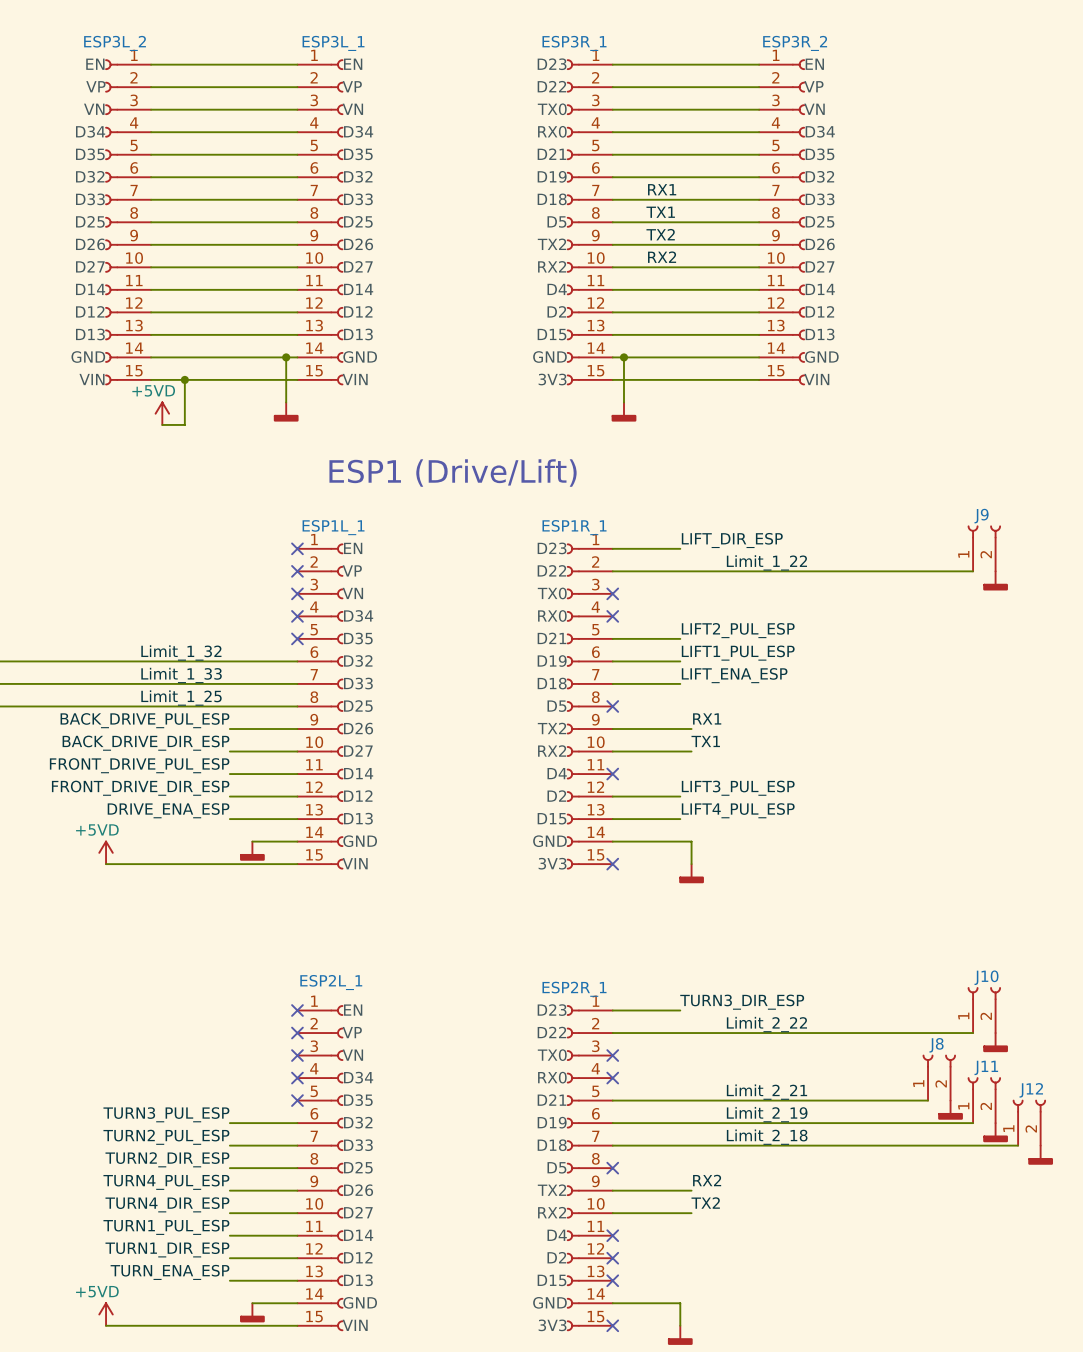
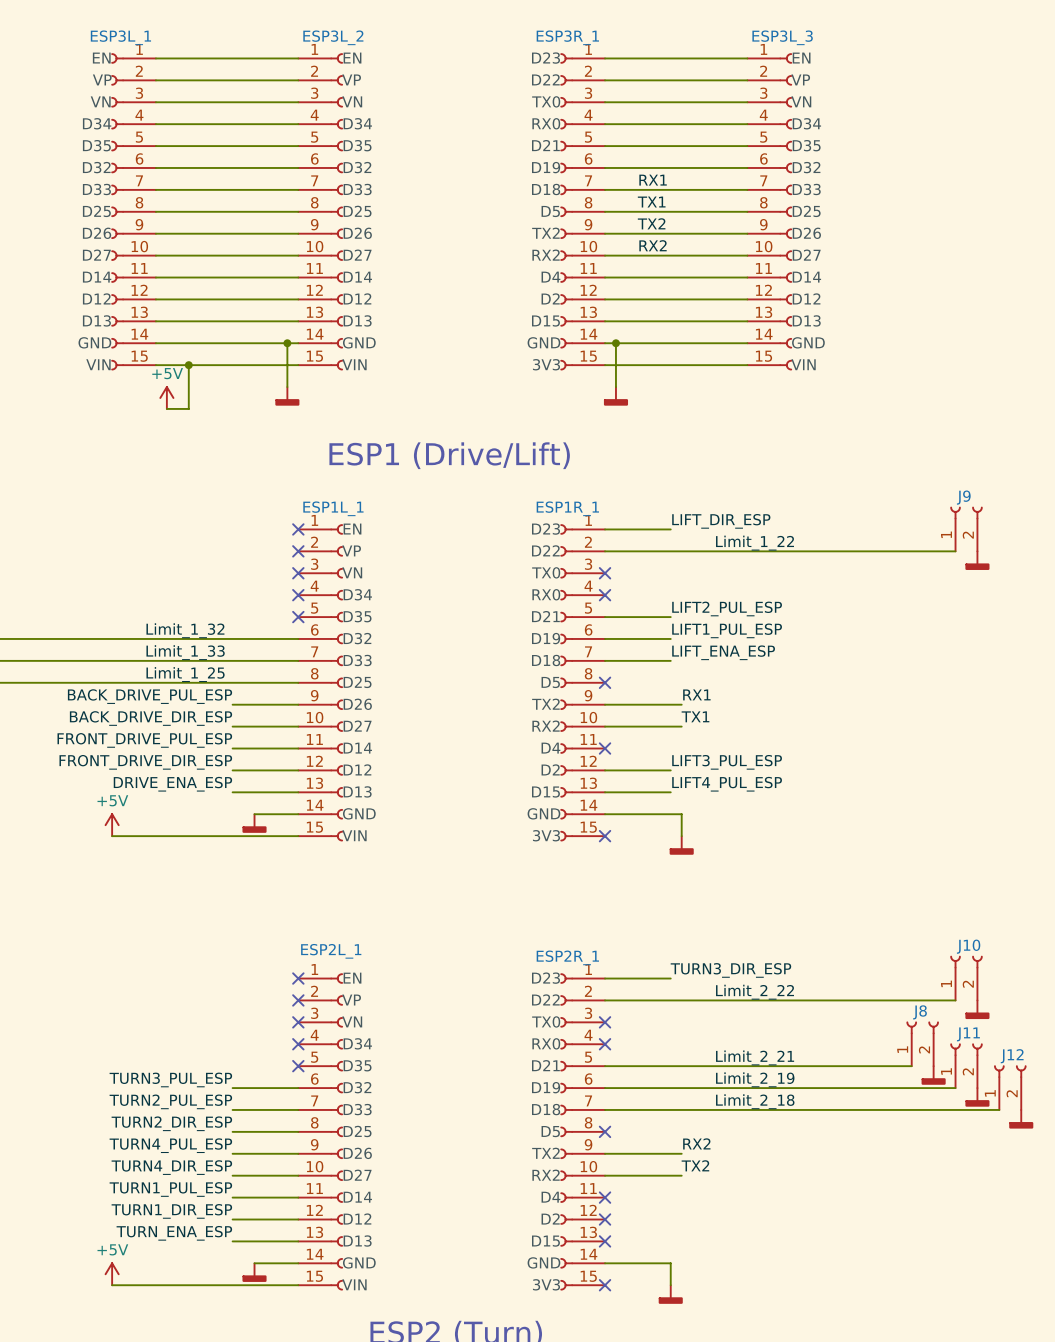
ESP3L_2 name: ESP3L_2 (115, 43) -> ESP3L_1 (120, 37)
ESP3L_1 name: ESP3L_1 (333, 43) -> ESP3L_2 (333, 37)
ESP3R_2 name: ESP3R_2 (795, 43) -> ESP3L_3 (782, 37)
power symbol: +5VD (162, 413) -> +5V (166, 398)
power symbol: +5VD (106, 852) -> +5V (112, 825)
power symbol: +5VD (106, 1314) -> +5V (112, 1274)

